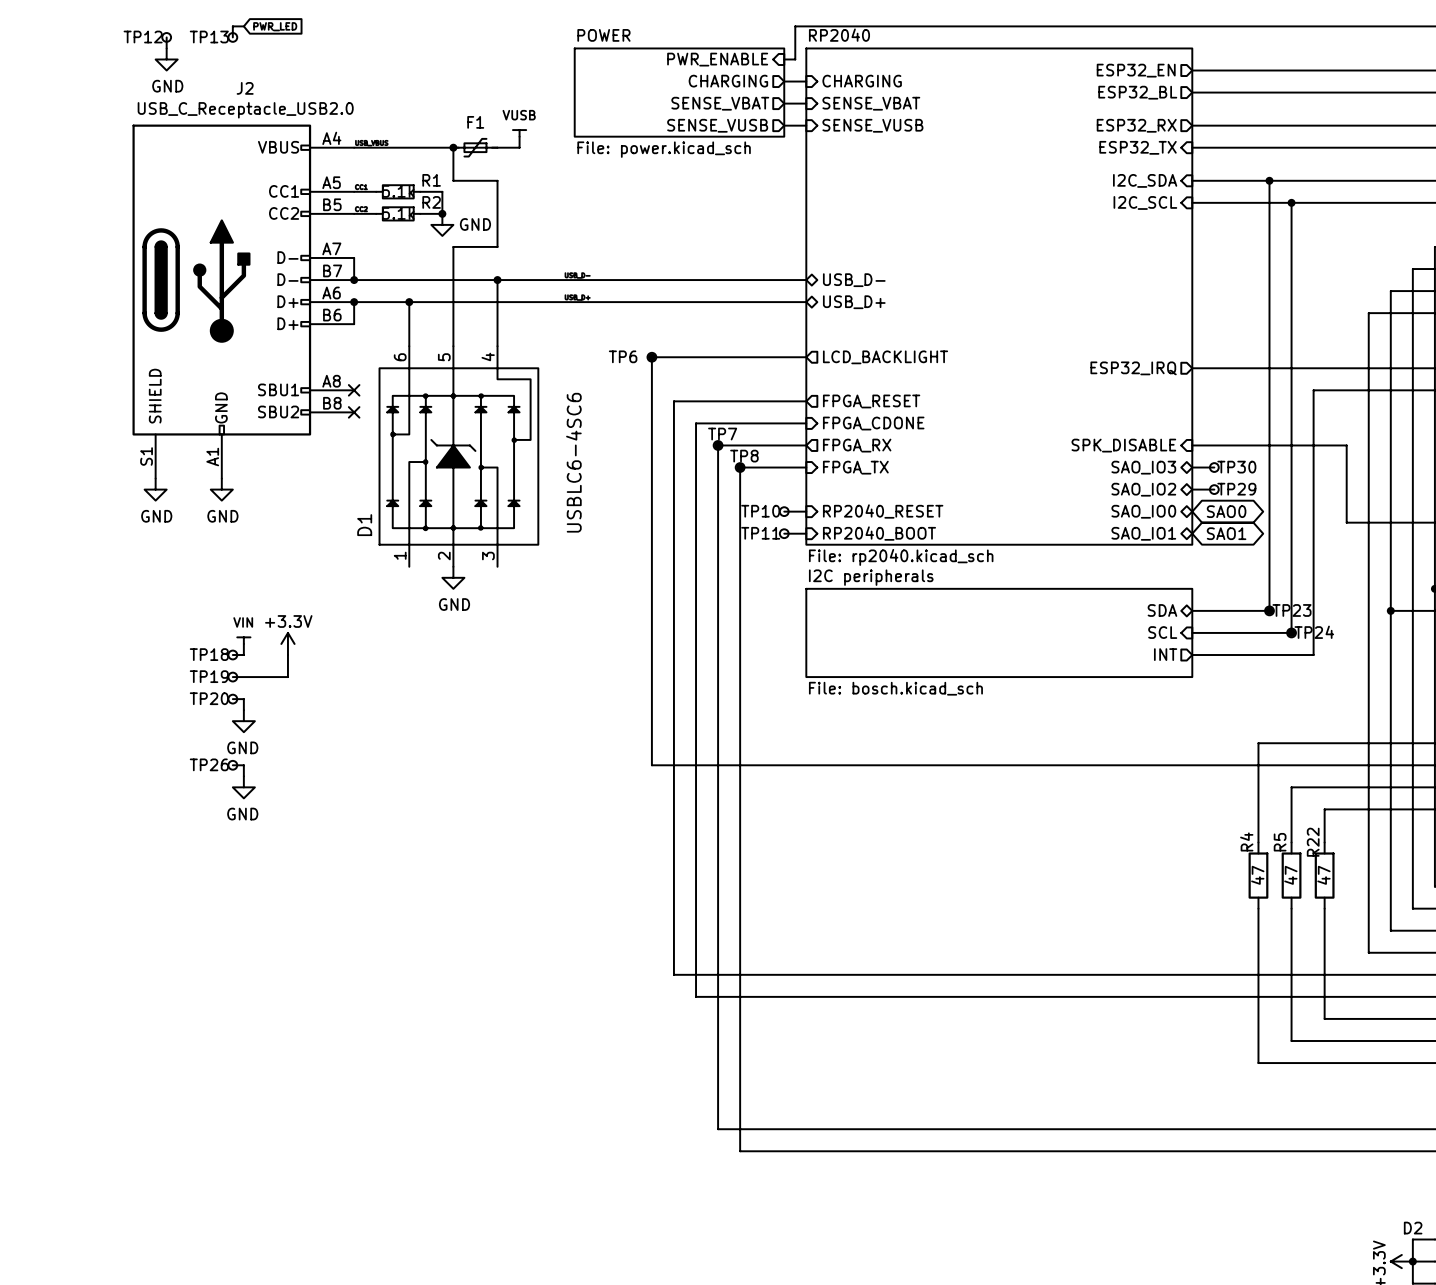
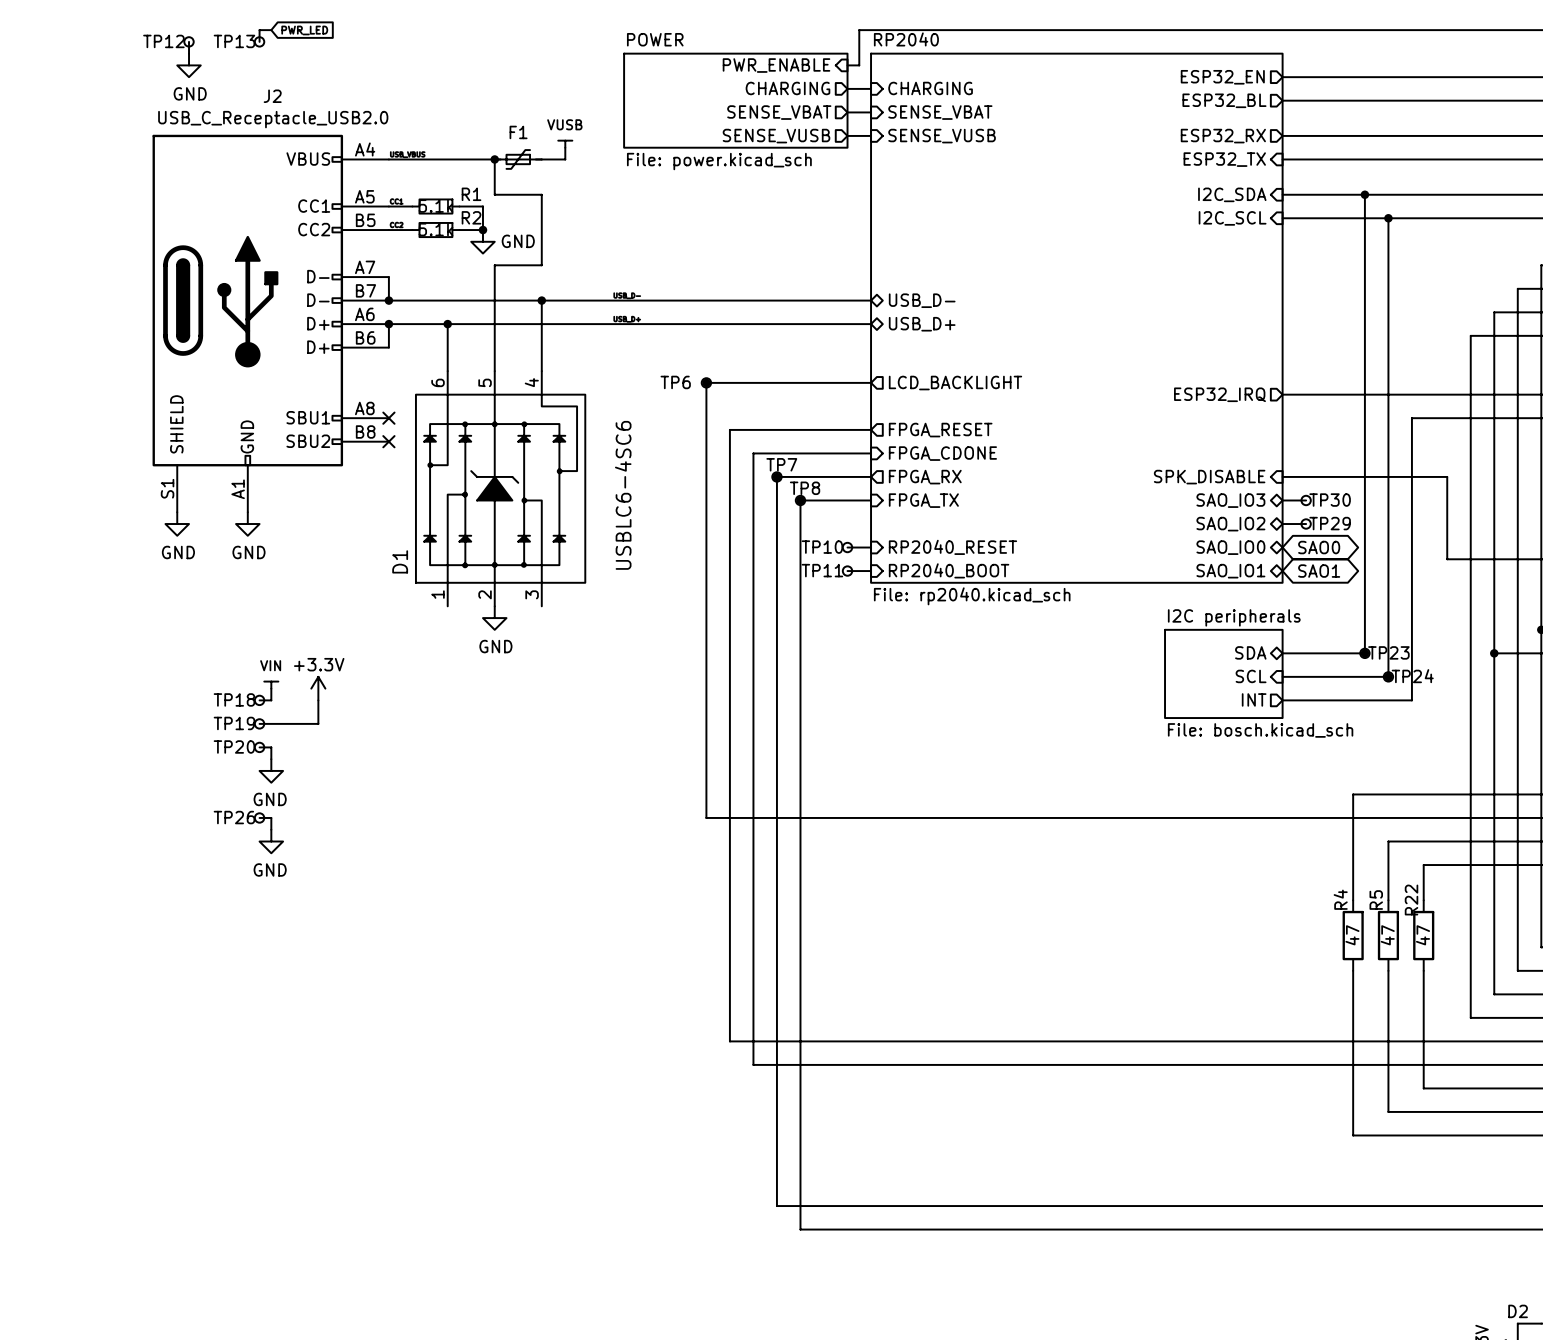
sheet I2C peripherals name position: I2C peripherals (871, 577) -> I2C peripherals (1234, 617)
sheet I2C peripherals shape: [806, 588, 1193, 678] -> [1165, 629, 1283, 719]
sheet I2C peripherals value position: File: bosch.kicad_sch (895, 688) -> File: bosch.kicad_sch (1260, 730)

